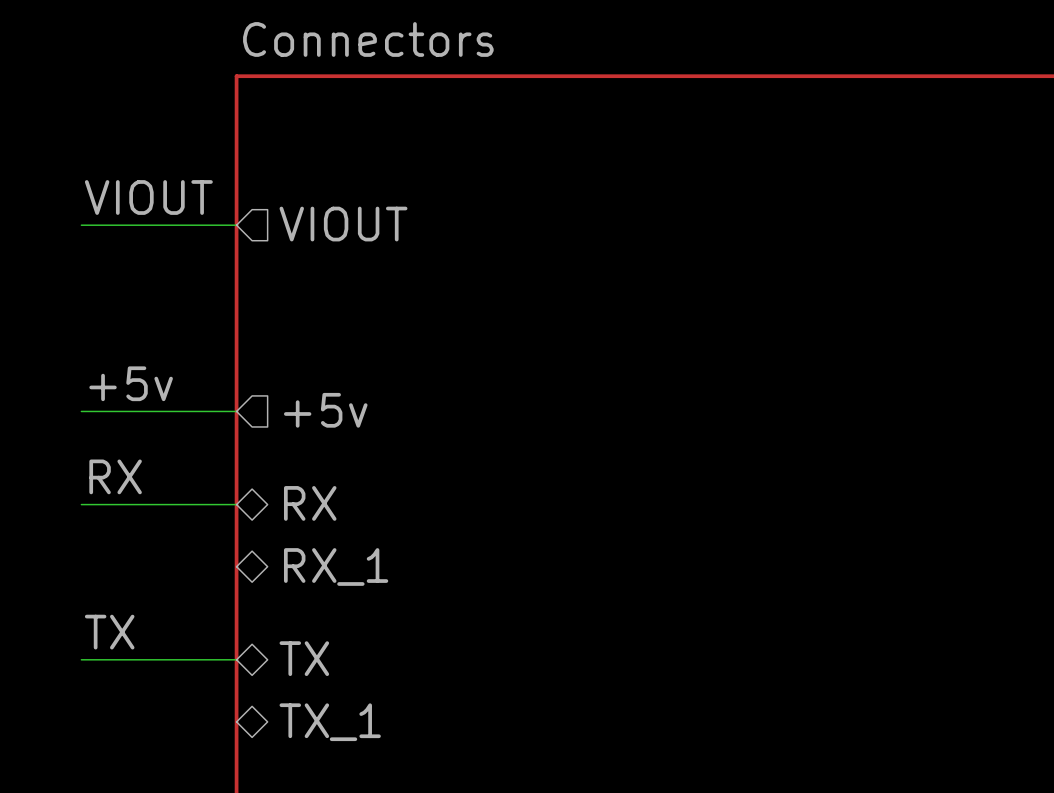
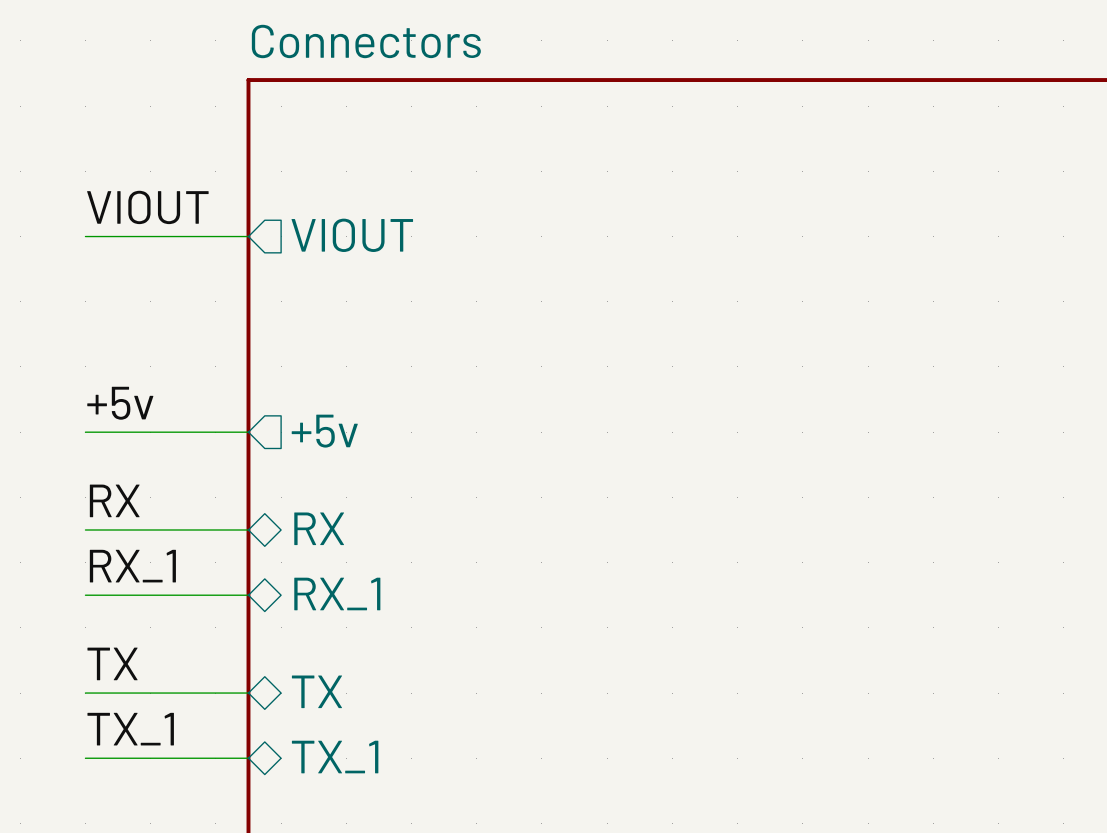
label: none -> RX_1 (132, 566)
wire: none -> (85, 595) (248, 595)
label: none -> TX_1 (130, 729)
wire: none -> (85, 758) (248, 758)

